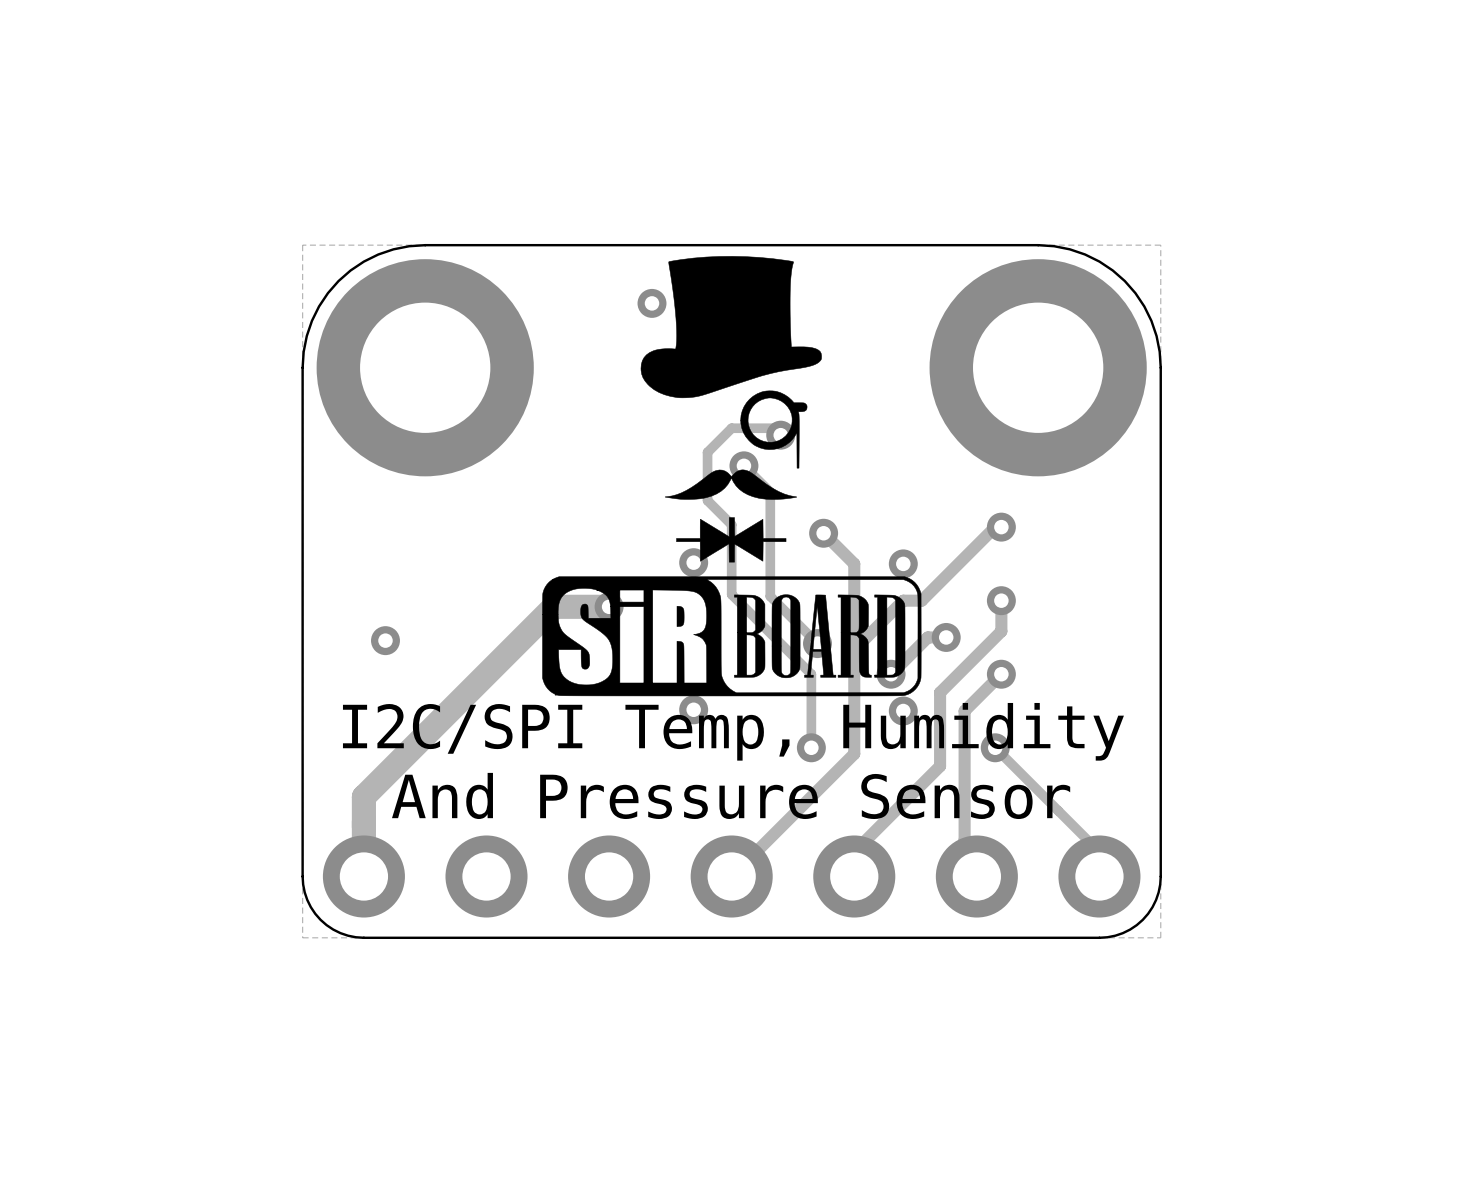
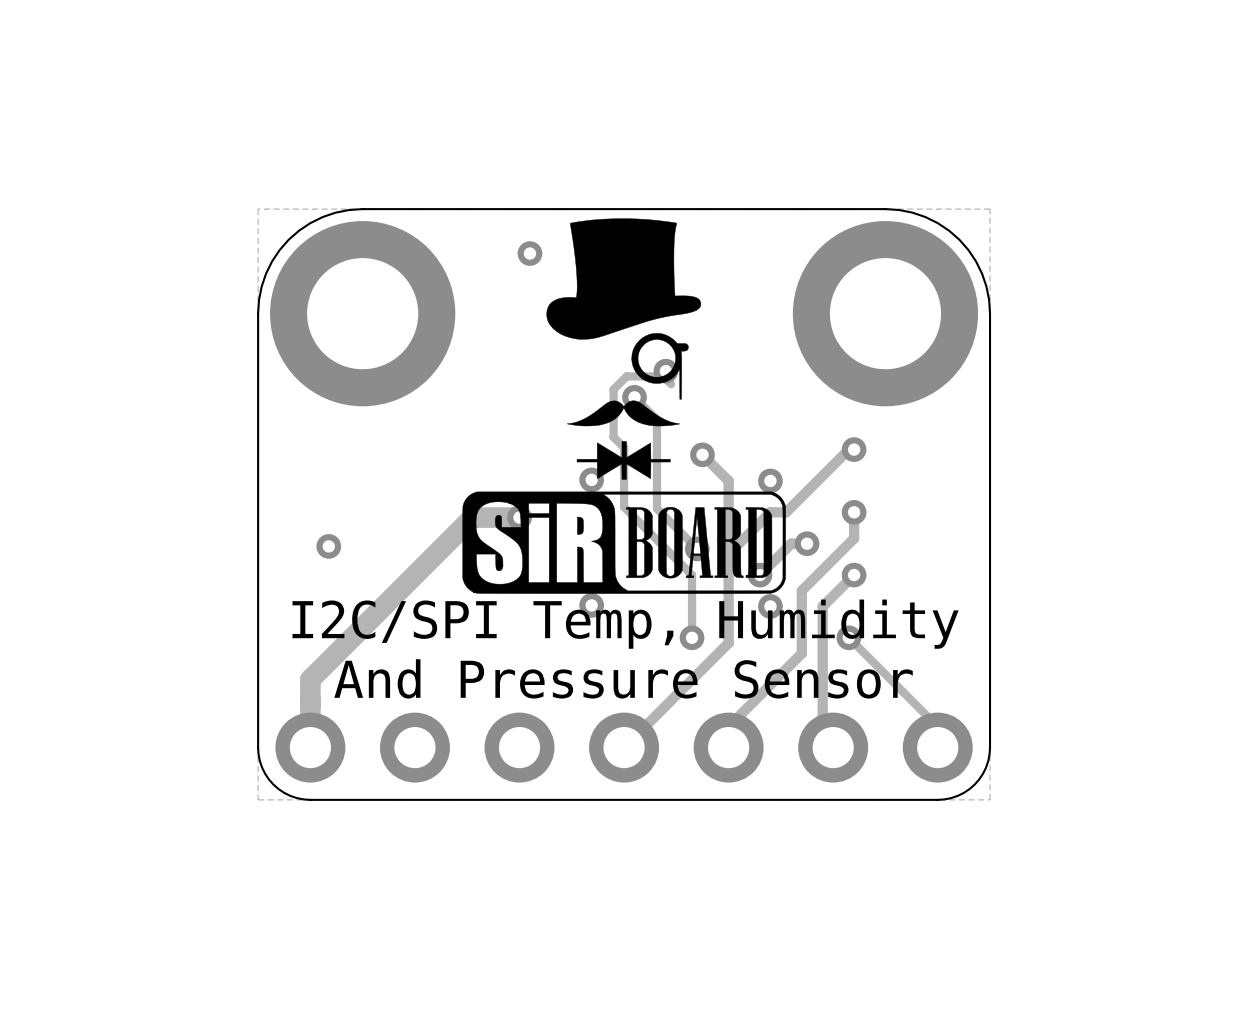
via position: (652, 303) -> (529, 253)
track: (780, 435) (773, 428) (731, 428) (707, 452) (707, 500) (719, 512) -> (671, 384) (663, 376) (626, 376) (613, 389) (613, 437)

